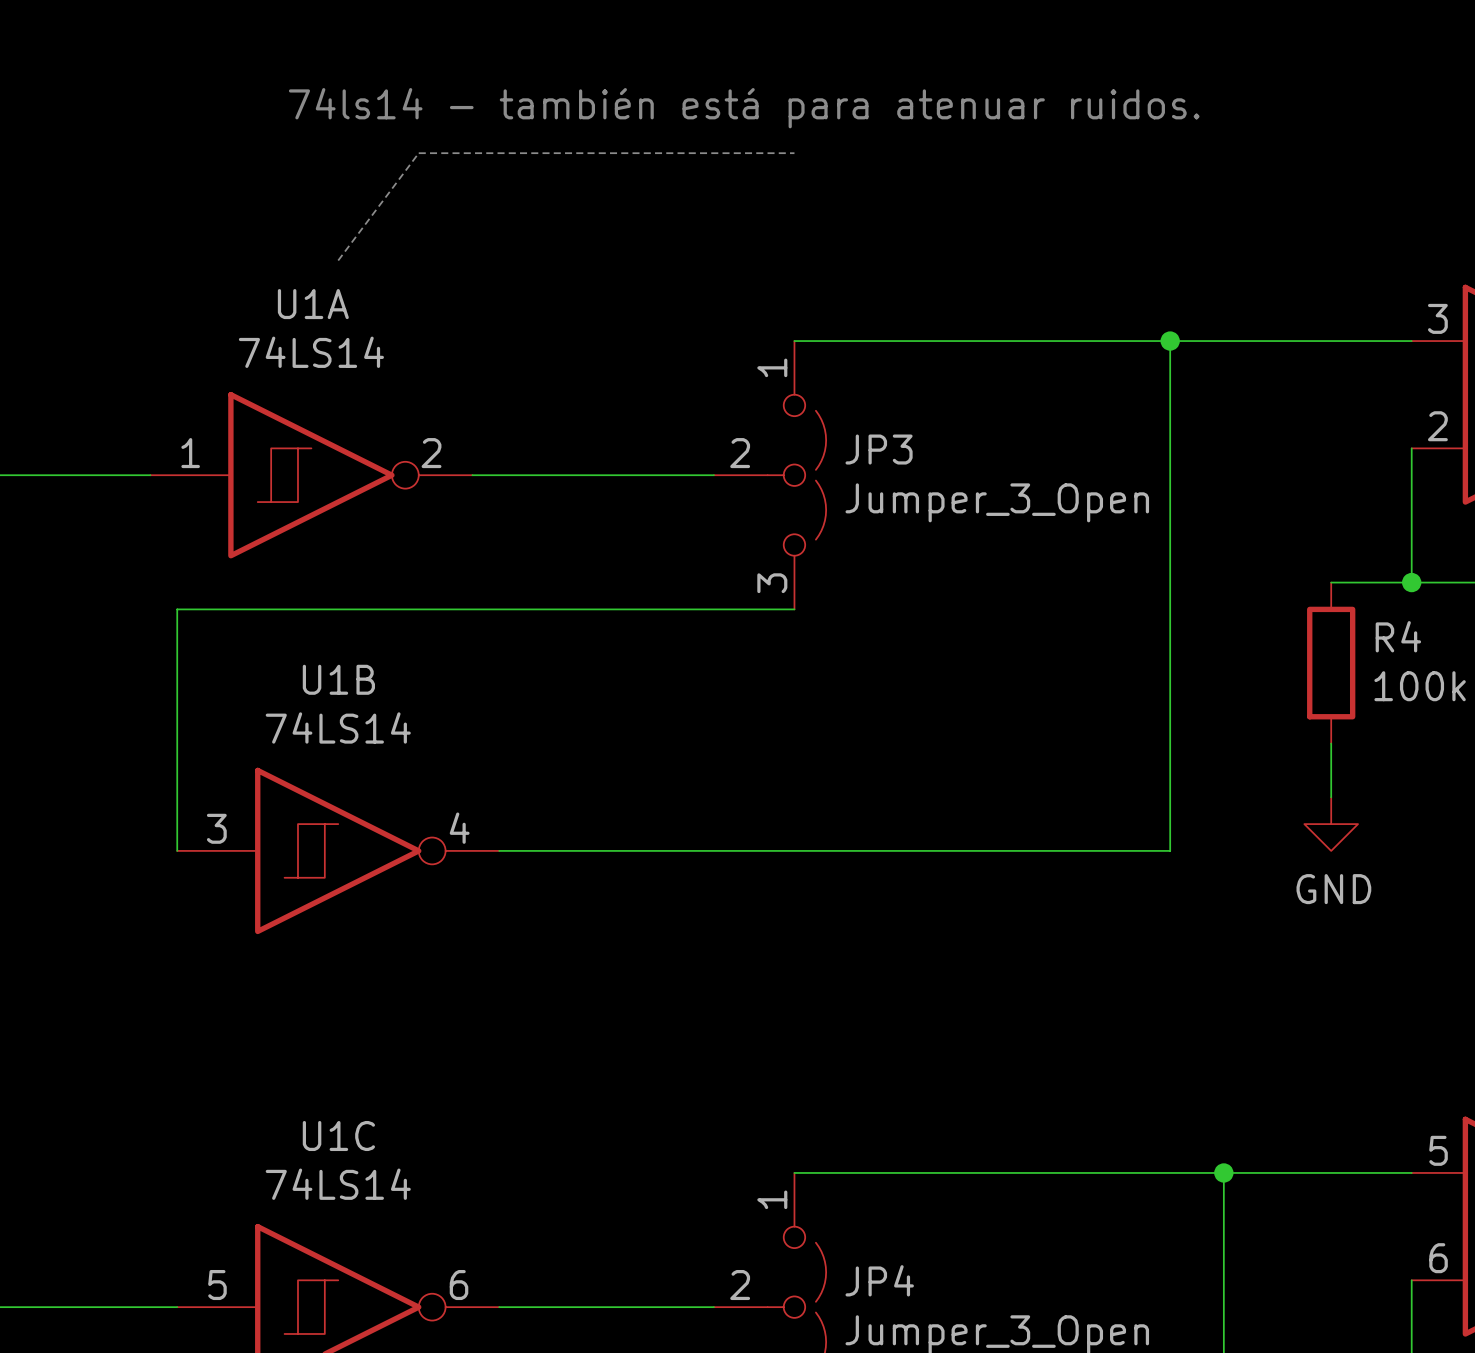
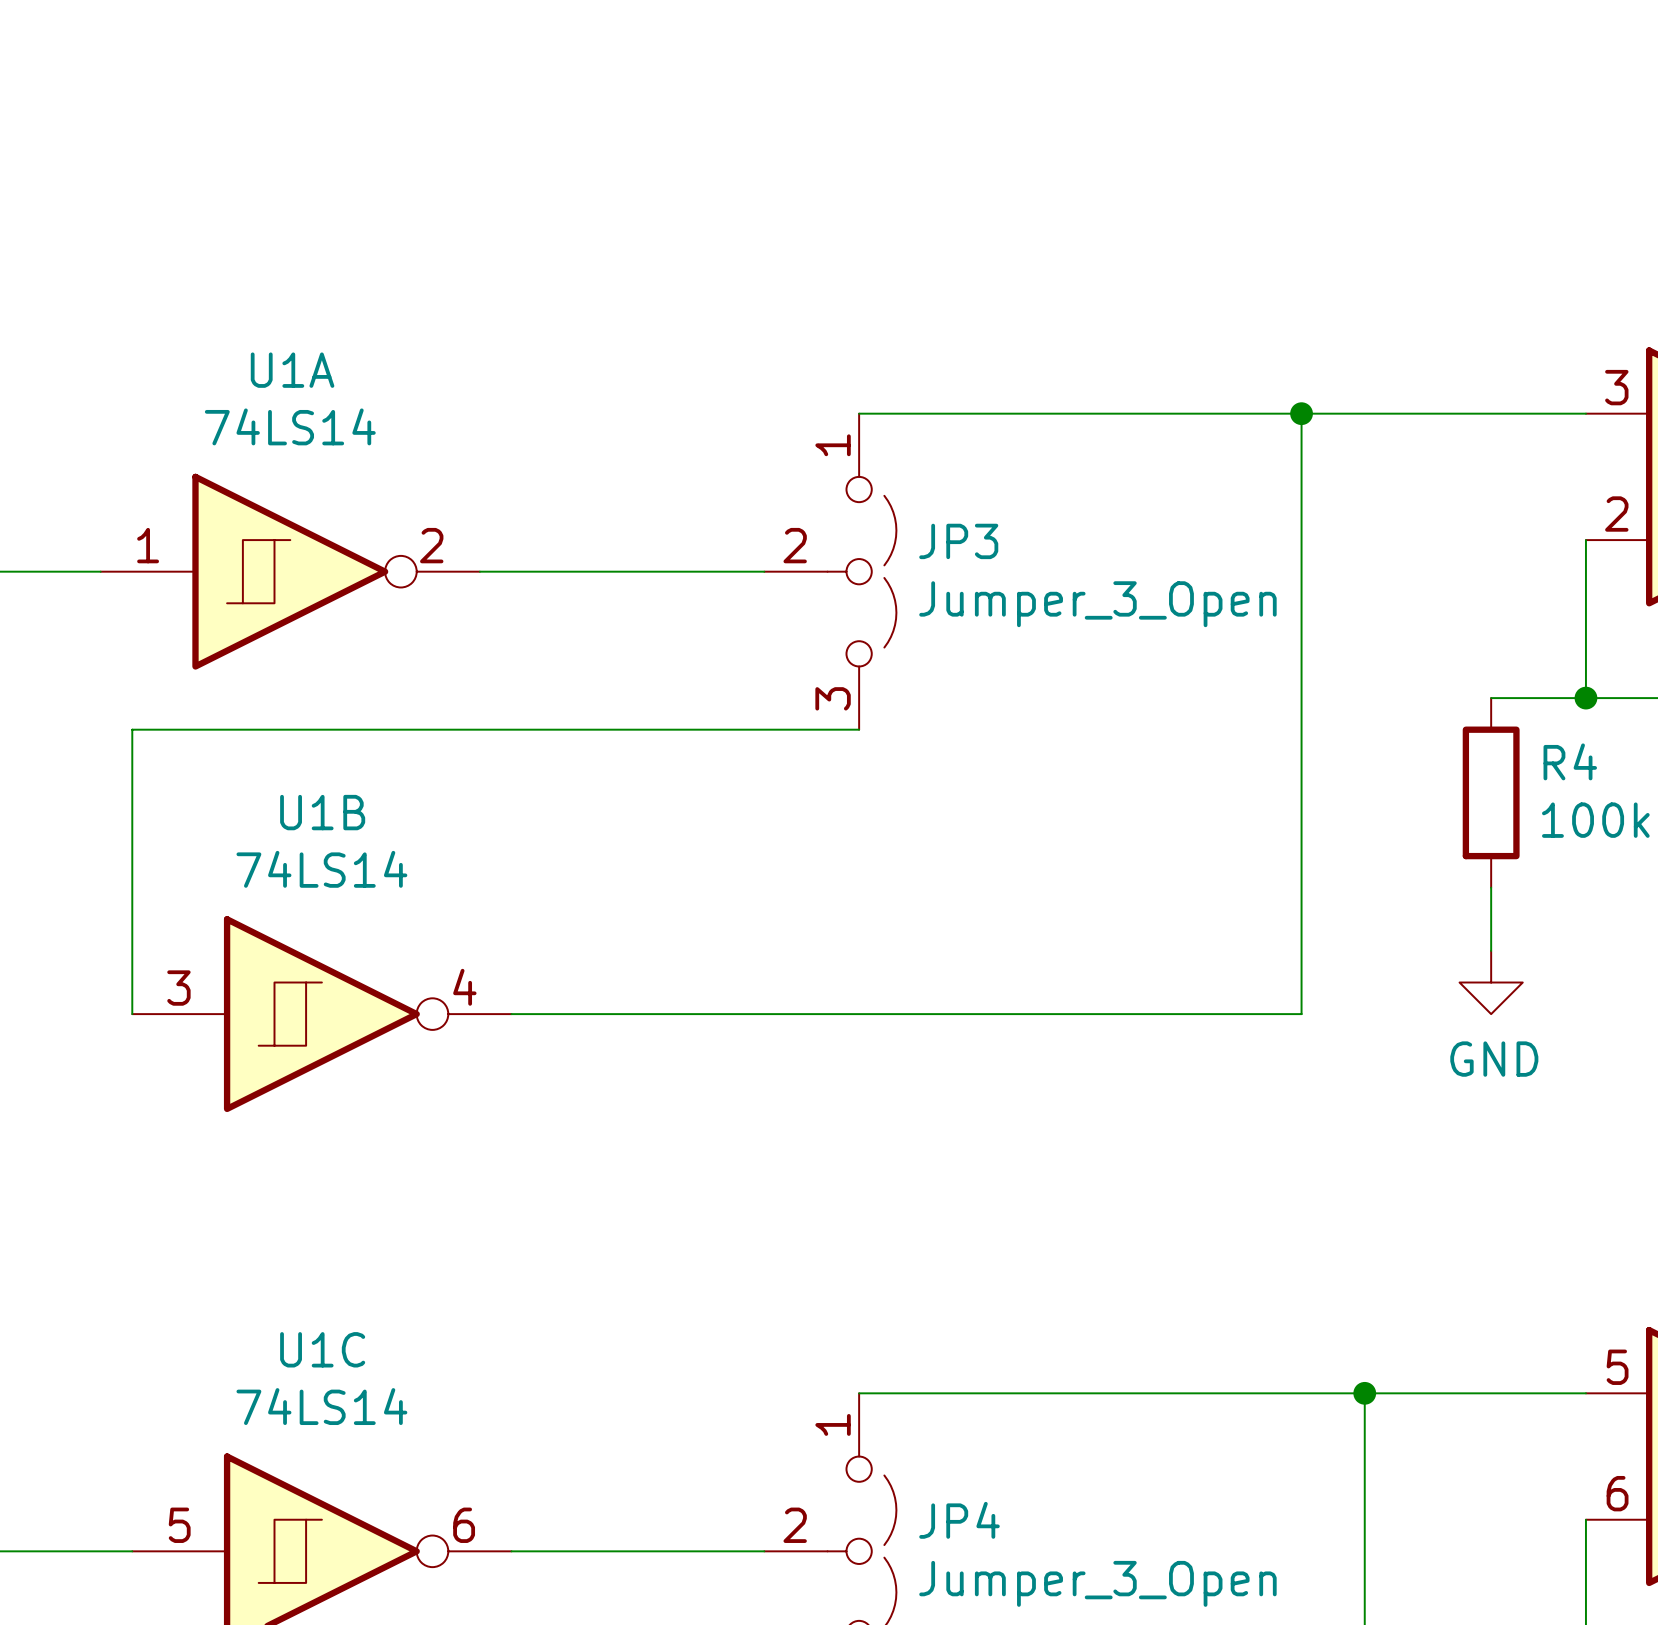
text: 74ls14 - también está para atenuar ruidos. (744, 108) -> none
line: (794, 153) (418, 153) (338, 260) -> none

